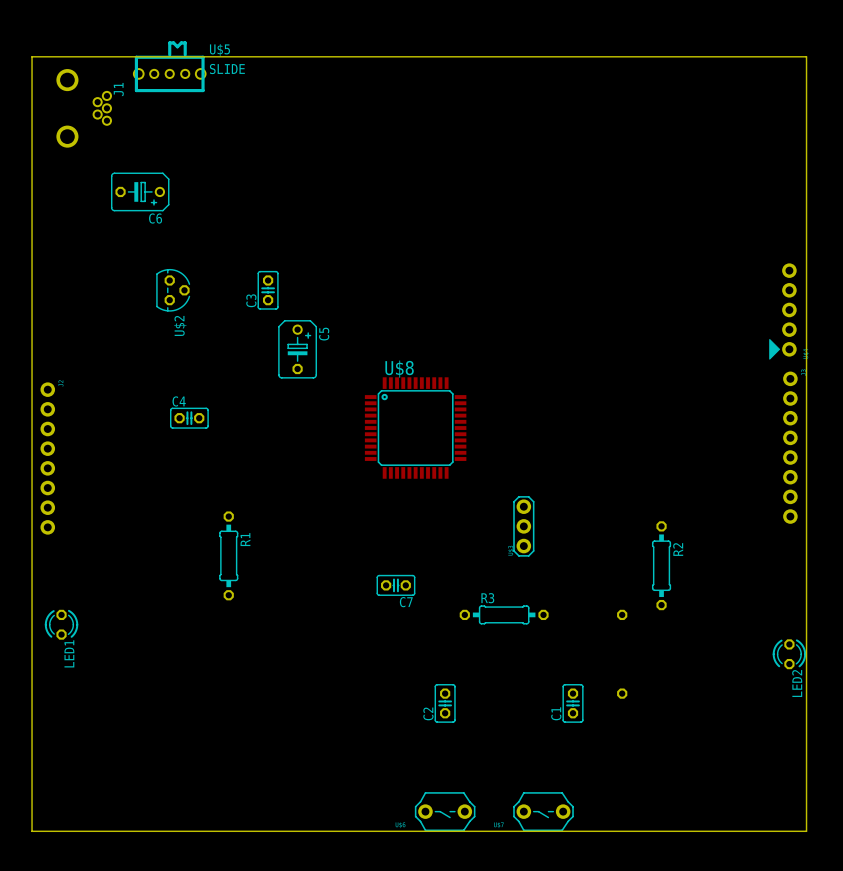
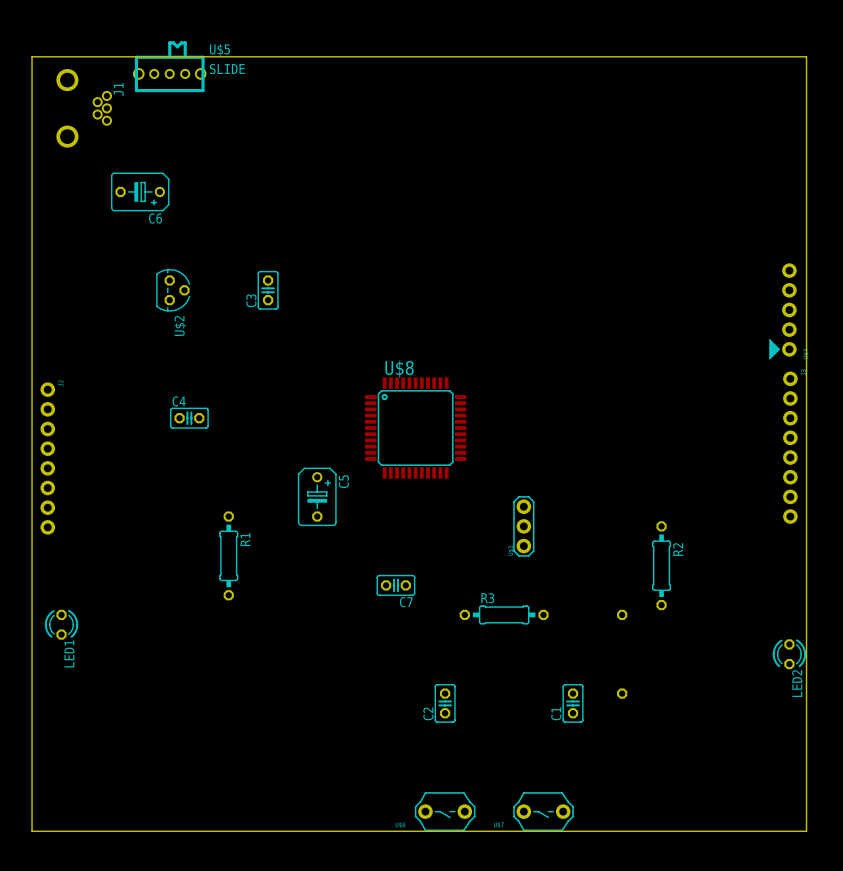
C5 position: (297, 349) -> (317, 496)

